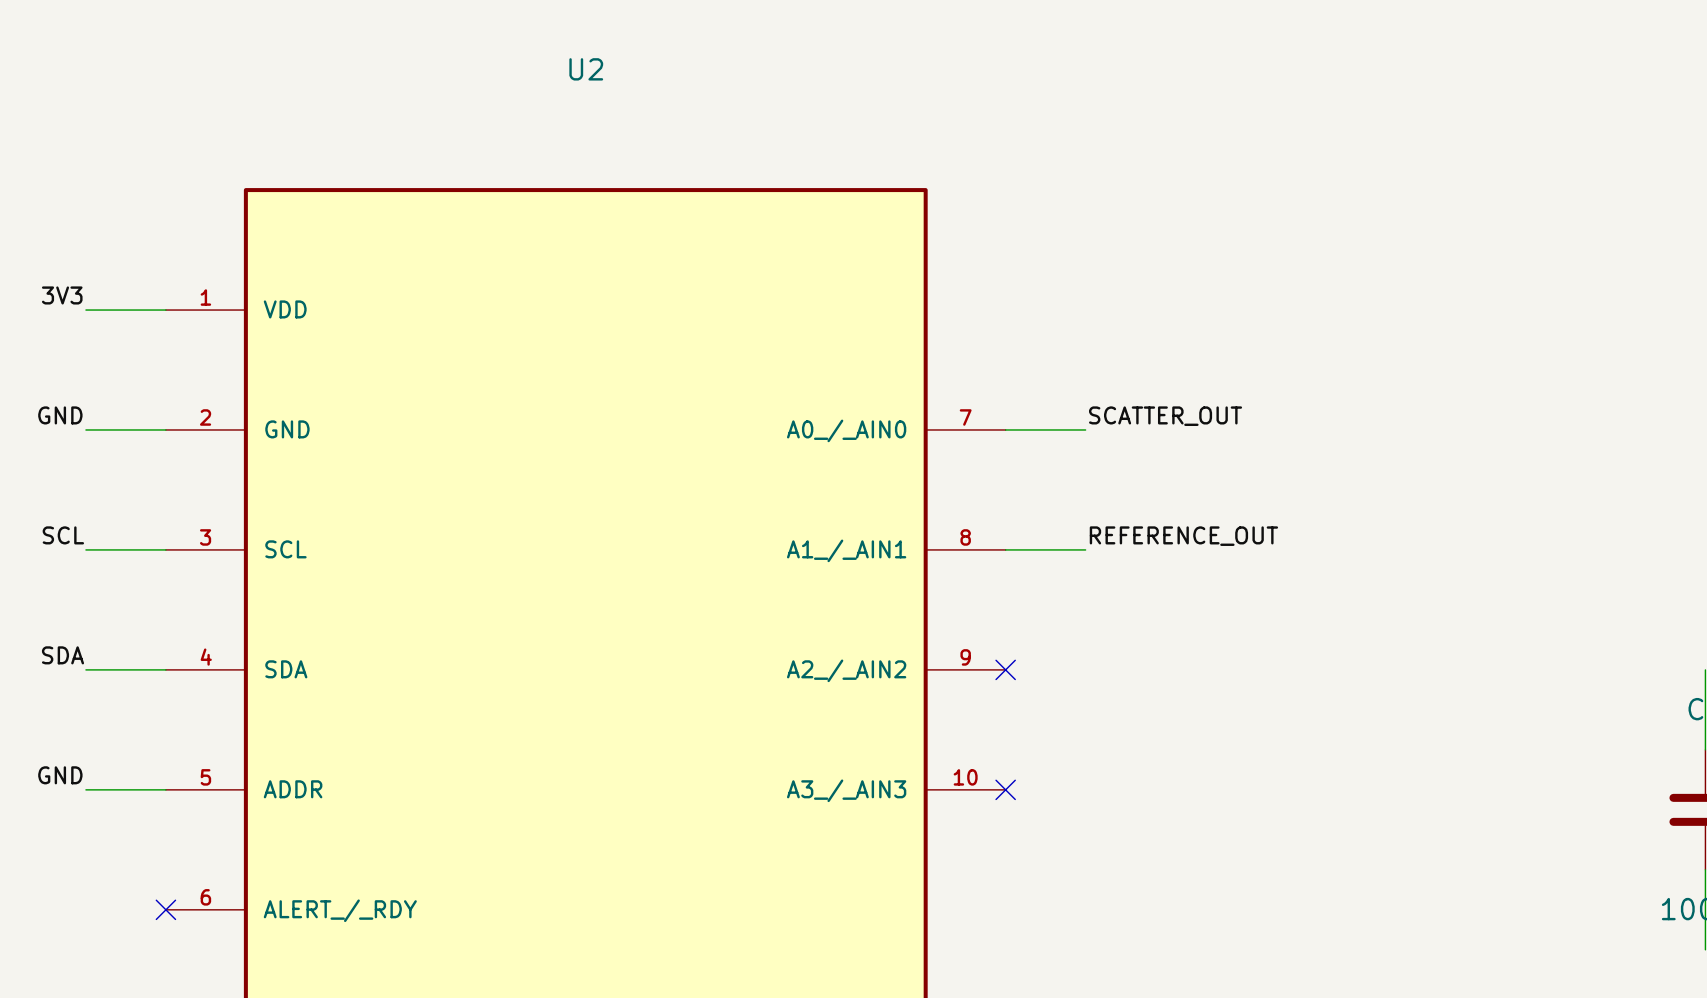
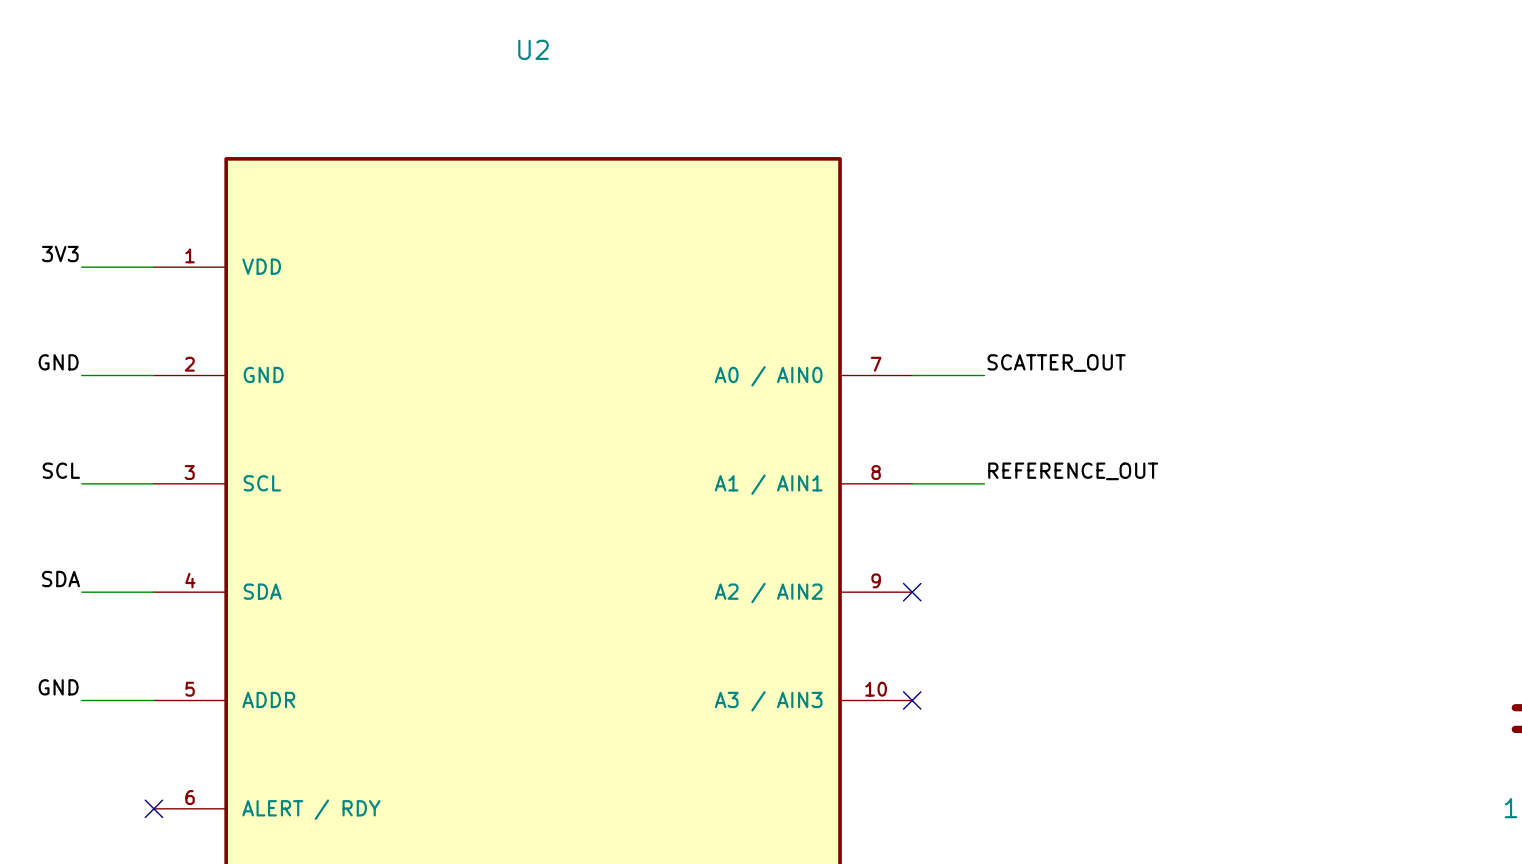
U2 pin name: A0_/_AIN0 (846, 430) -> A0 / AIN0 (768, 376)
U2 pin name: A1_/_AIN1 (846, 550) -> A1 / AIN1 (768, 484)
U2 pin name: A2_/_AIN2 (846, 670) -> A2 / AIN2 (768, 592)
U2 pin name: A3_/_AIN3 (846, 790) -> A3 / AIN3 (768, 701)
U2 pin name: ALERT_/_RDY (340, 910) -> ALERT / RDY (311, 809)

